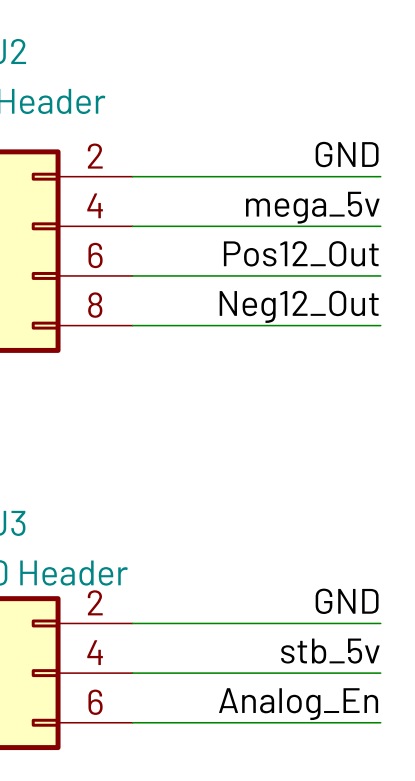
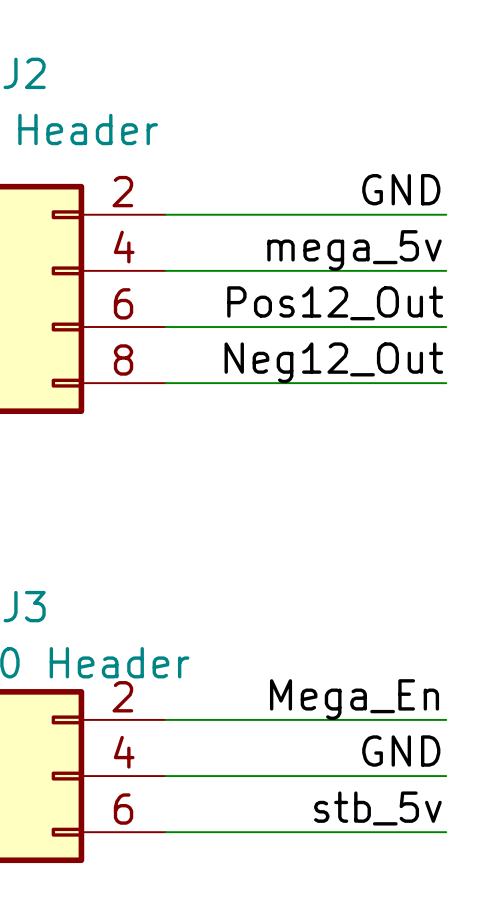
label: GND (347, 601) -> Mega_En (354, 699)
label: stb_5v (330, 651) -> GND (401, 751)
label: Analog_En (298, 704) -> stb_5v (377, 808)

